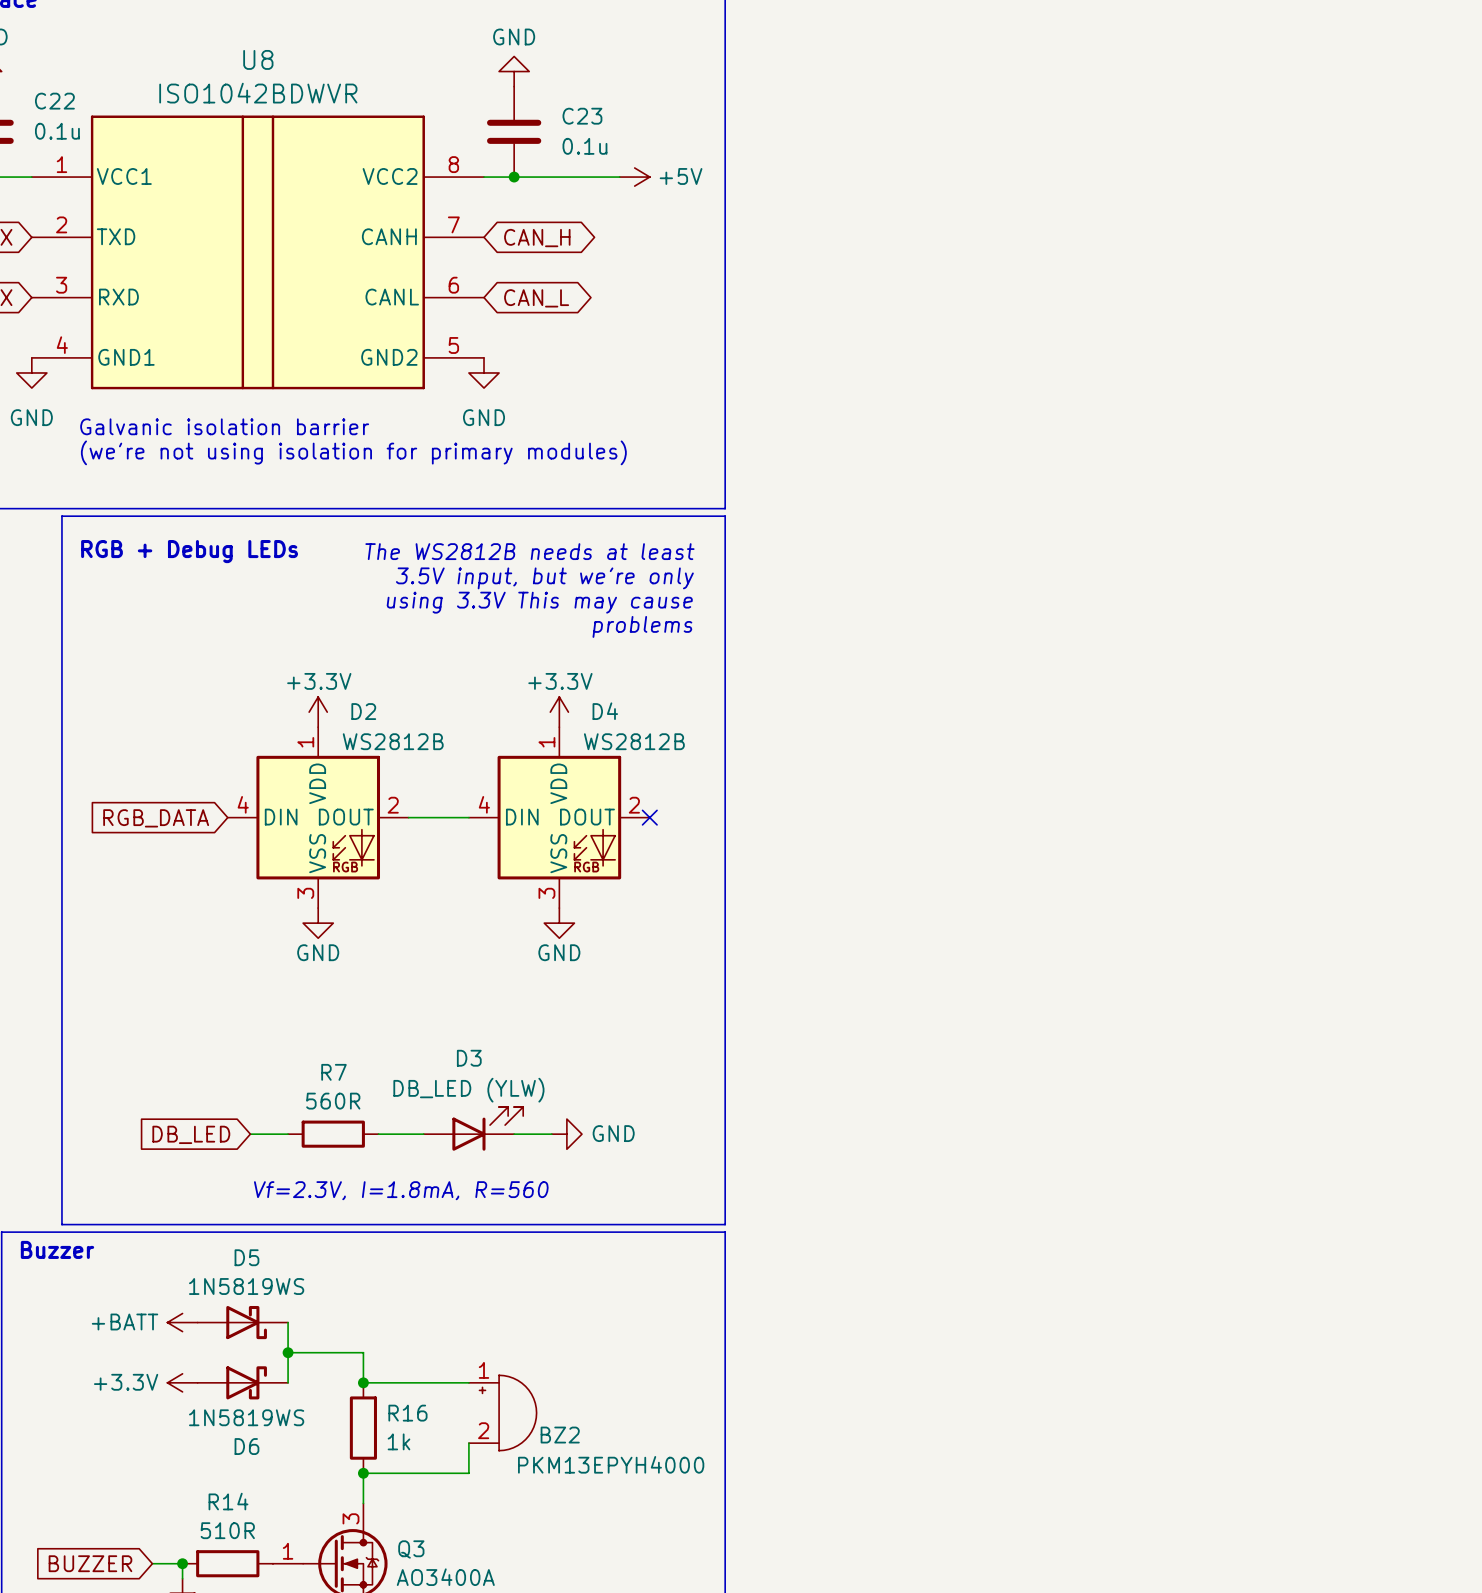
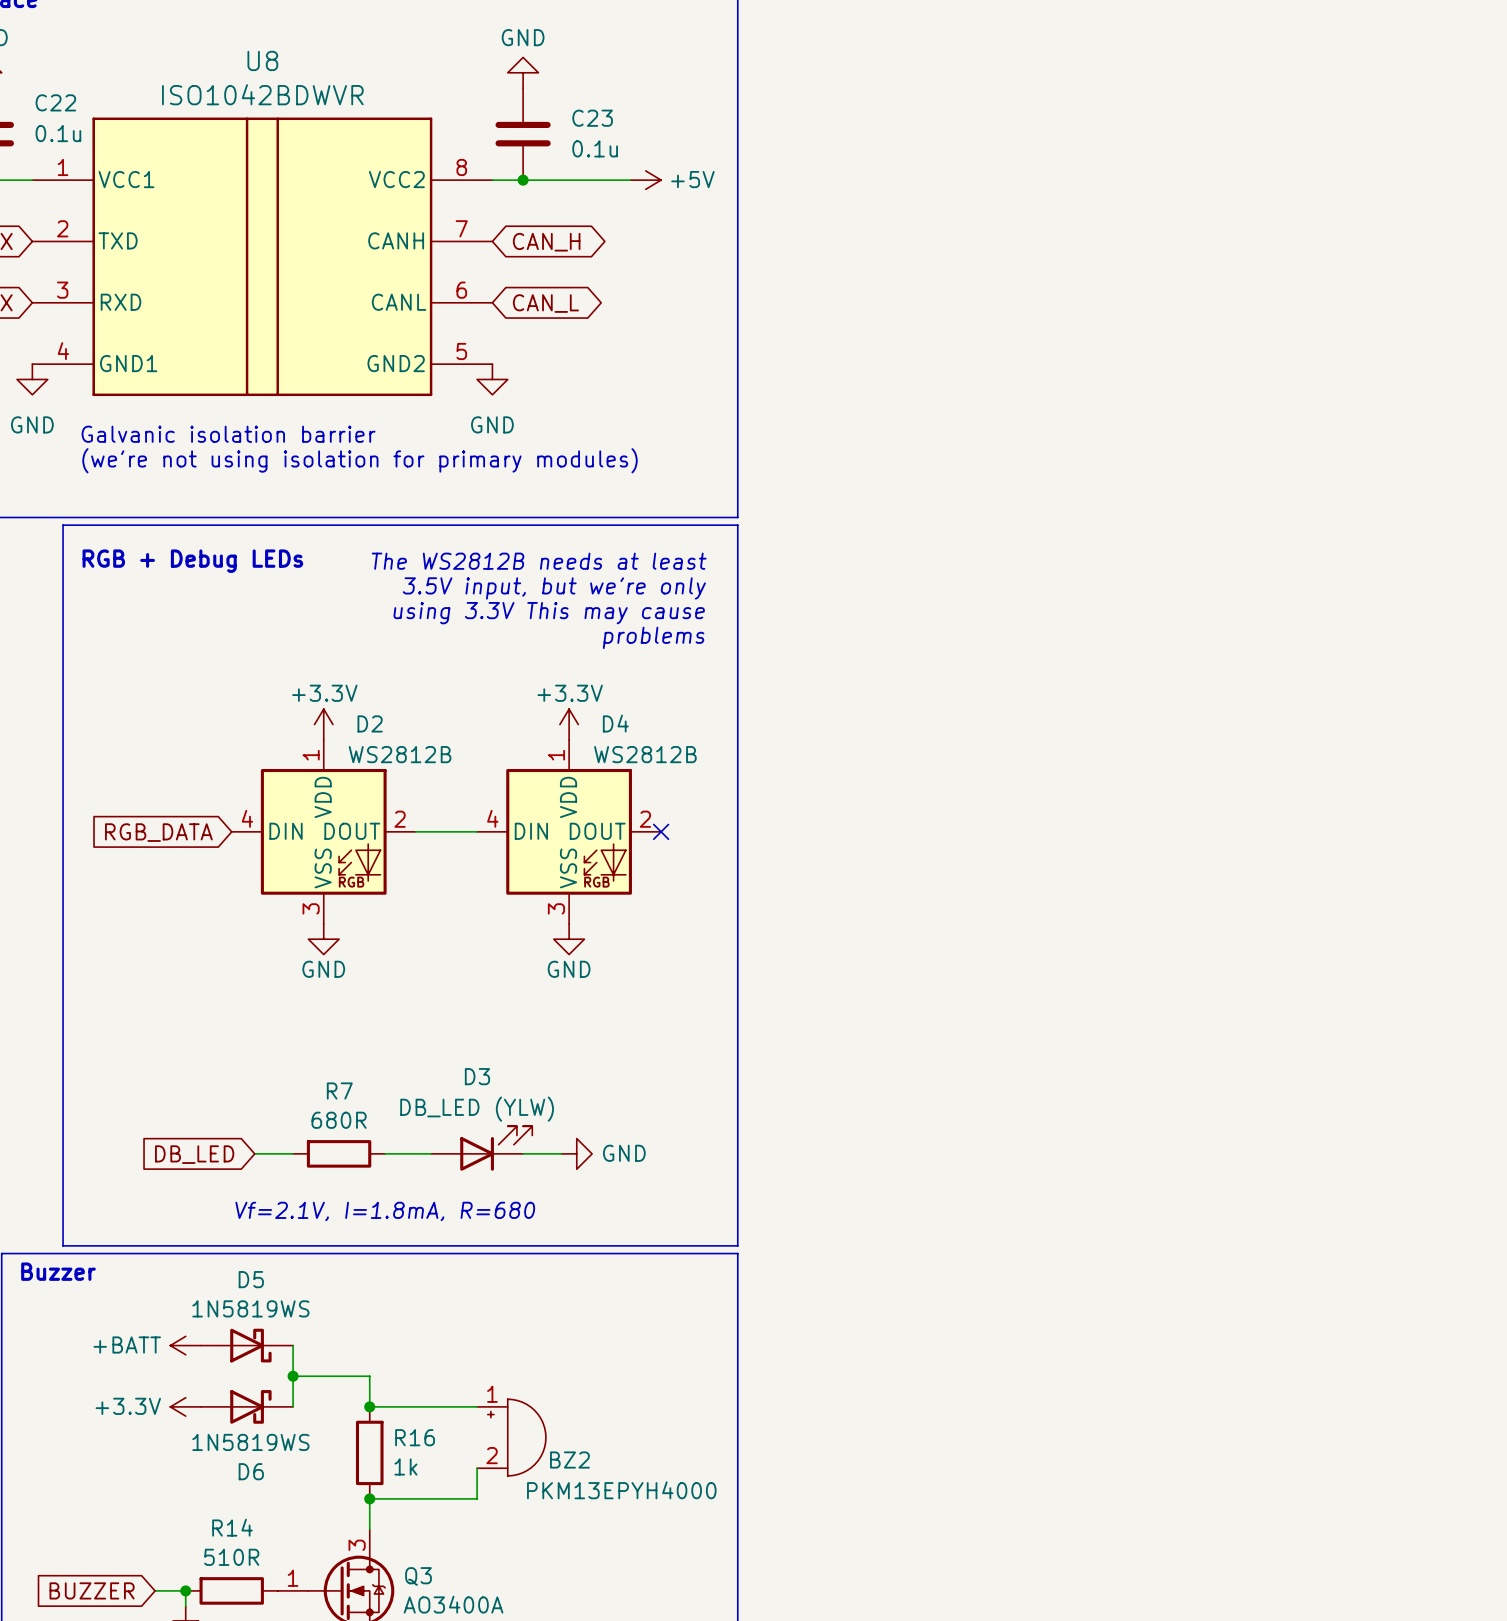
R7 value: 560R (333, 1101) -> 680R (339, 1120)
text: Vf=2.3V, I=1.8mA, R=560 (401, 1190) -> Vf=2.1V, I=1.8mA, R=680 (385, 1211)

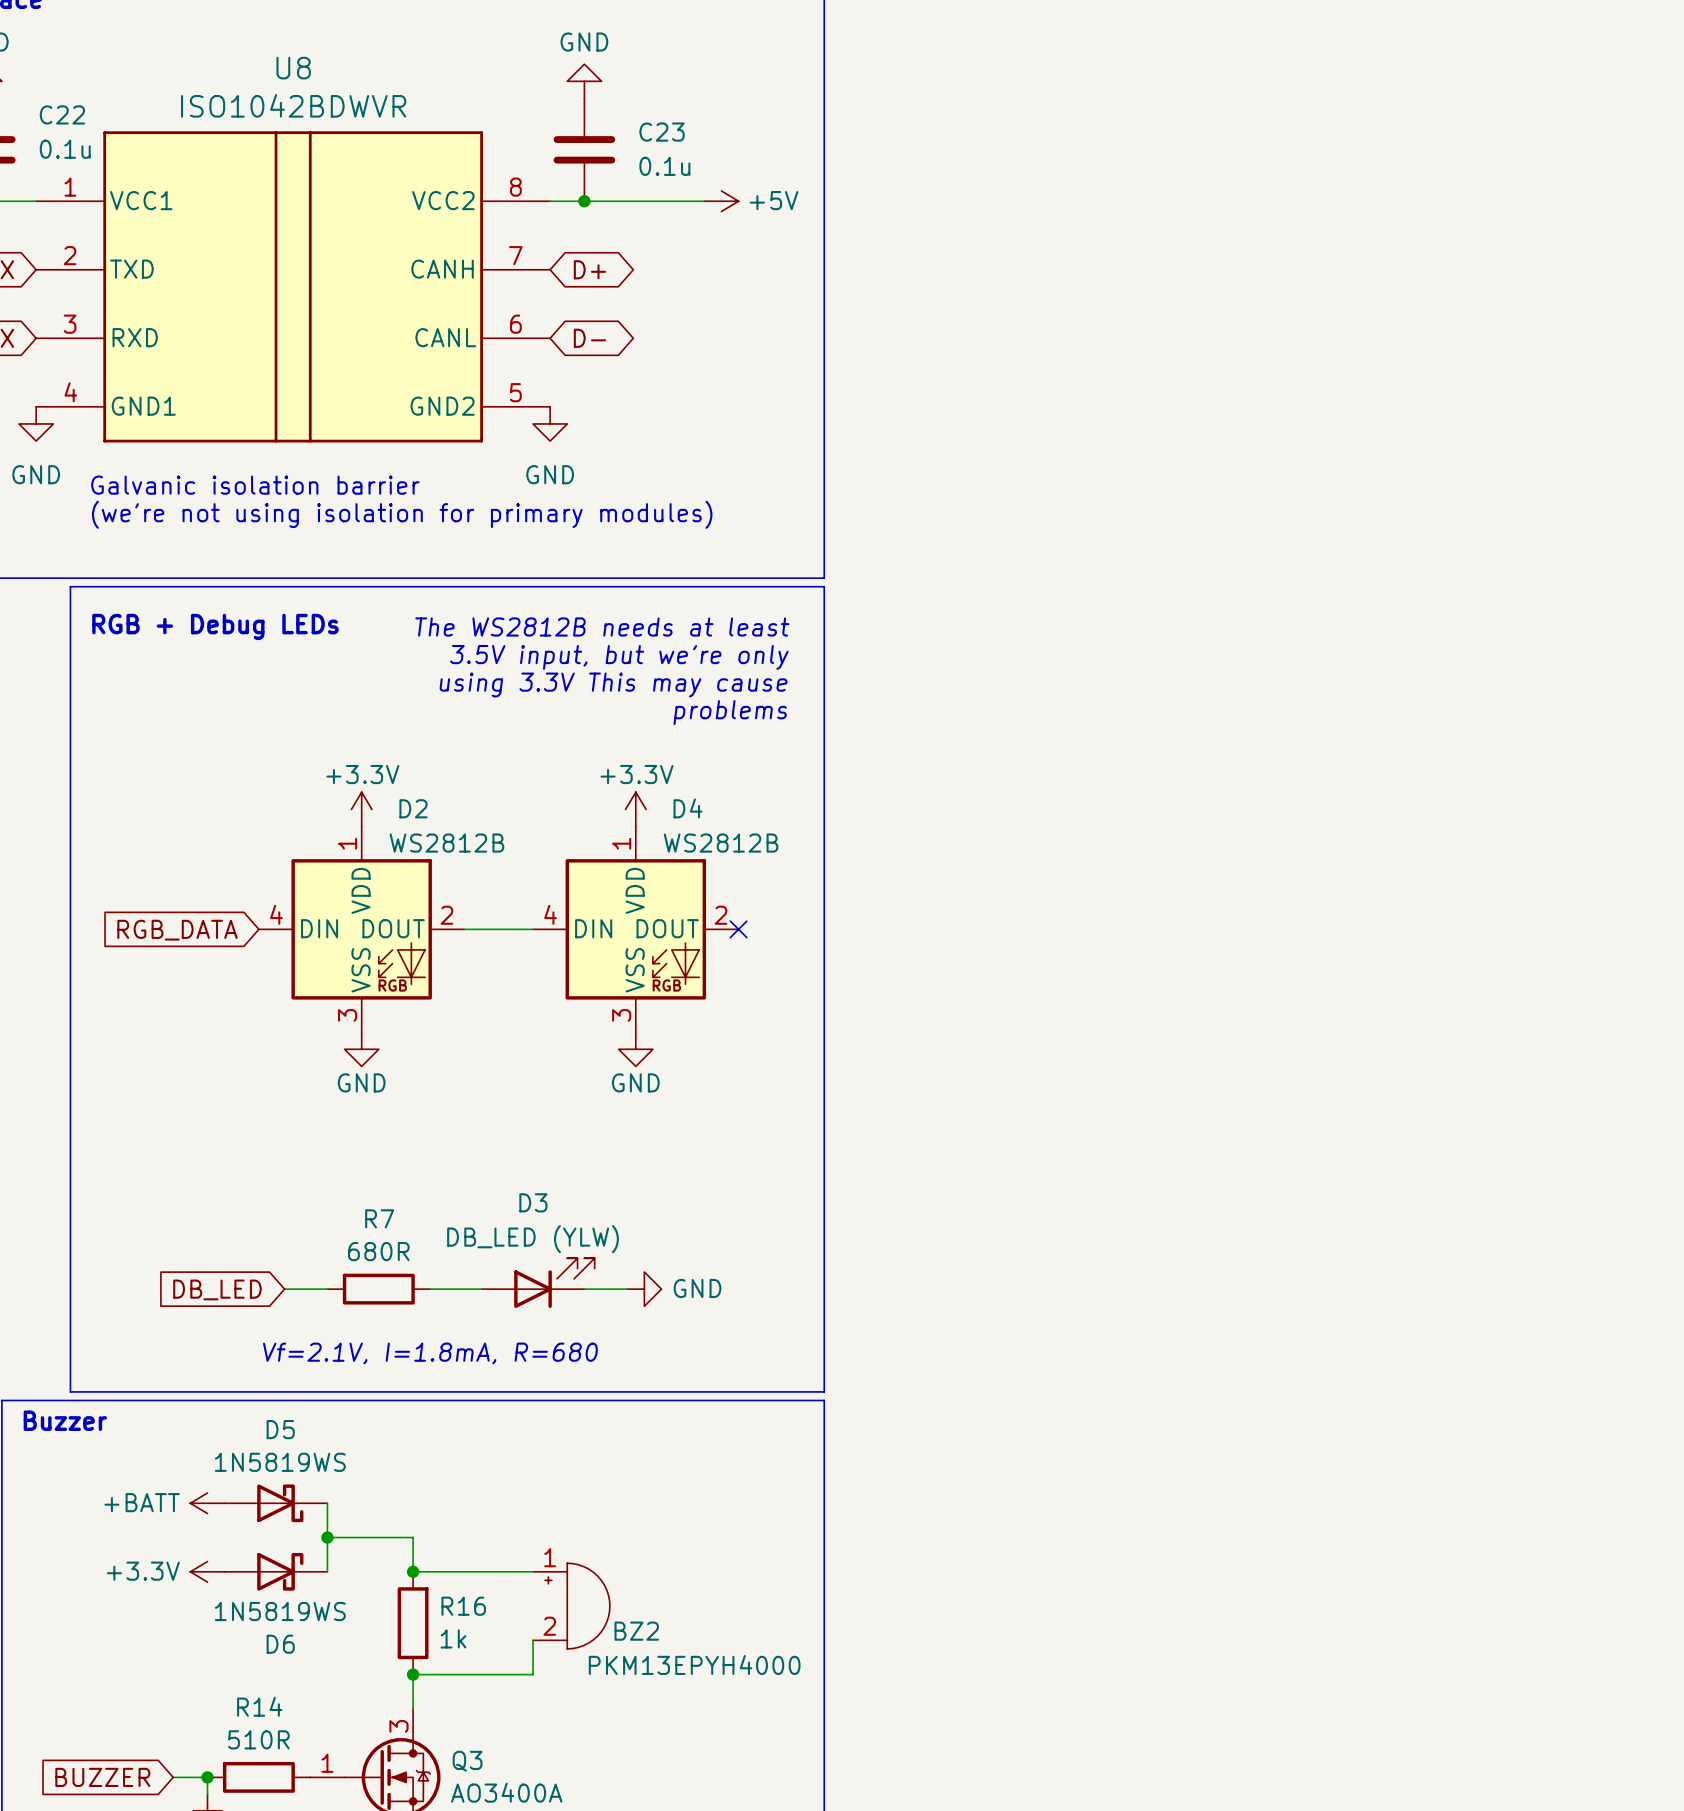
global label: CAN_H (546, 242) -> D+ (589, 269)
global label: CAN_L (545, 303) -> D- (589, 338)

